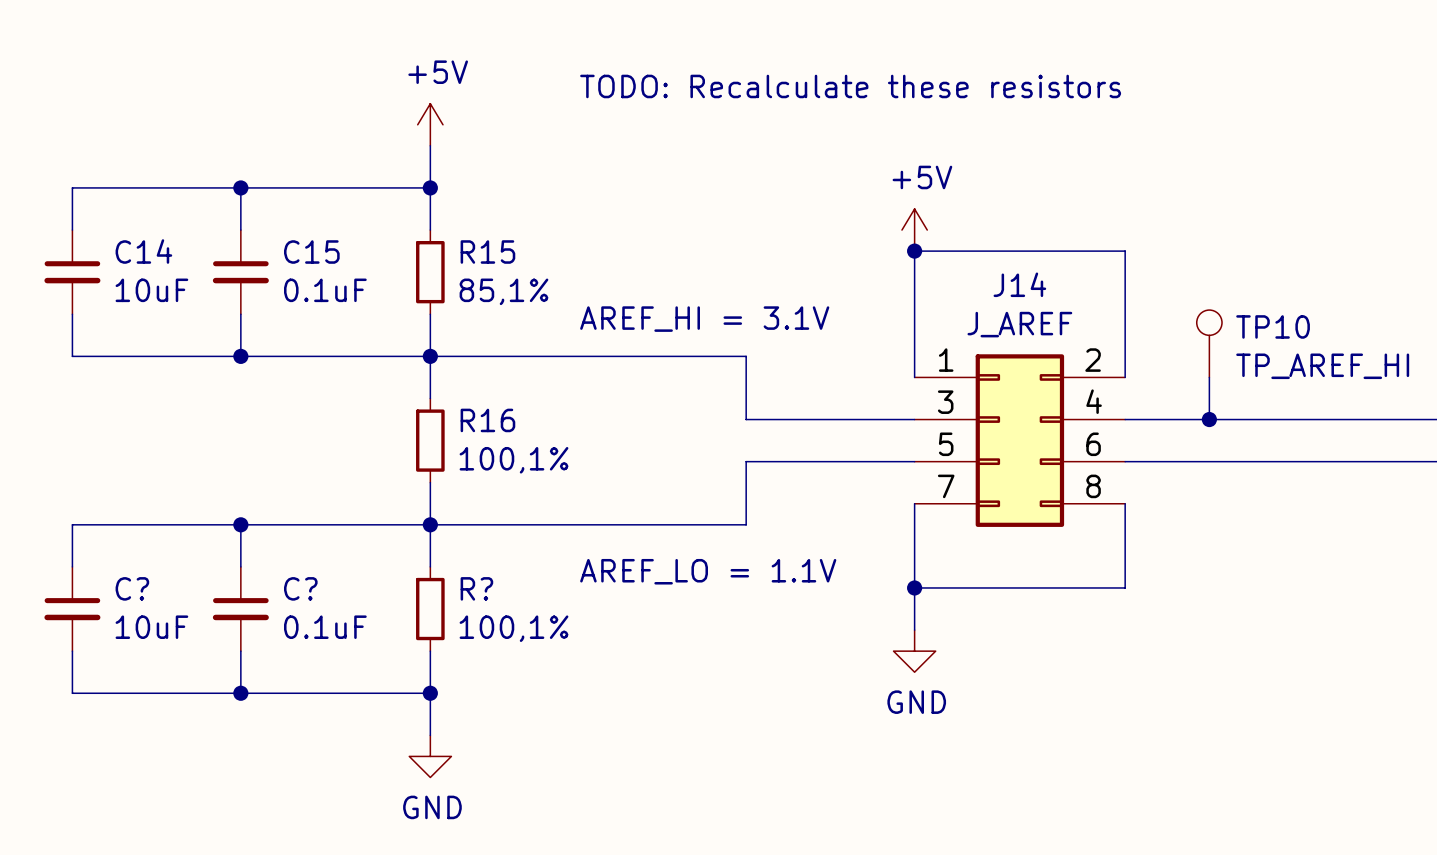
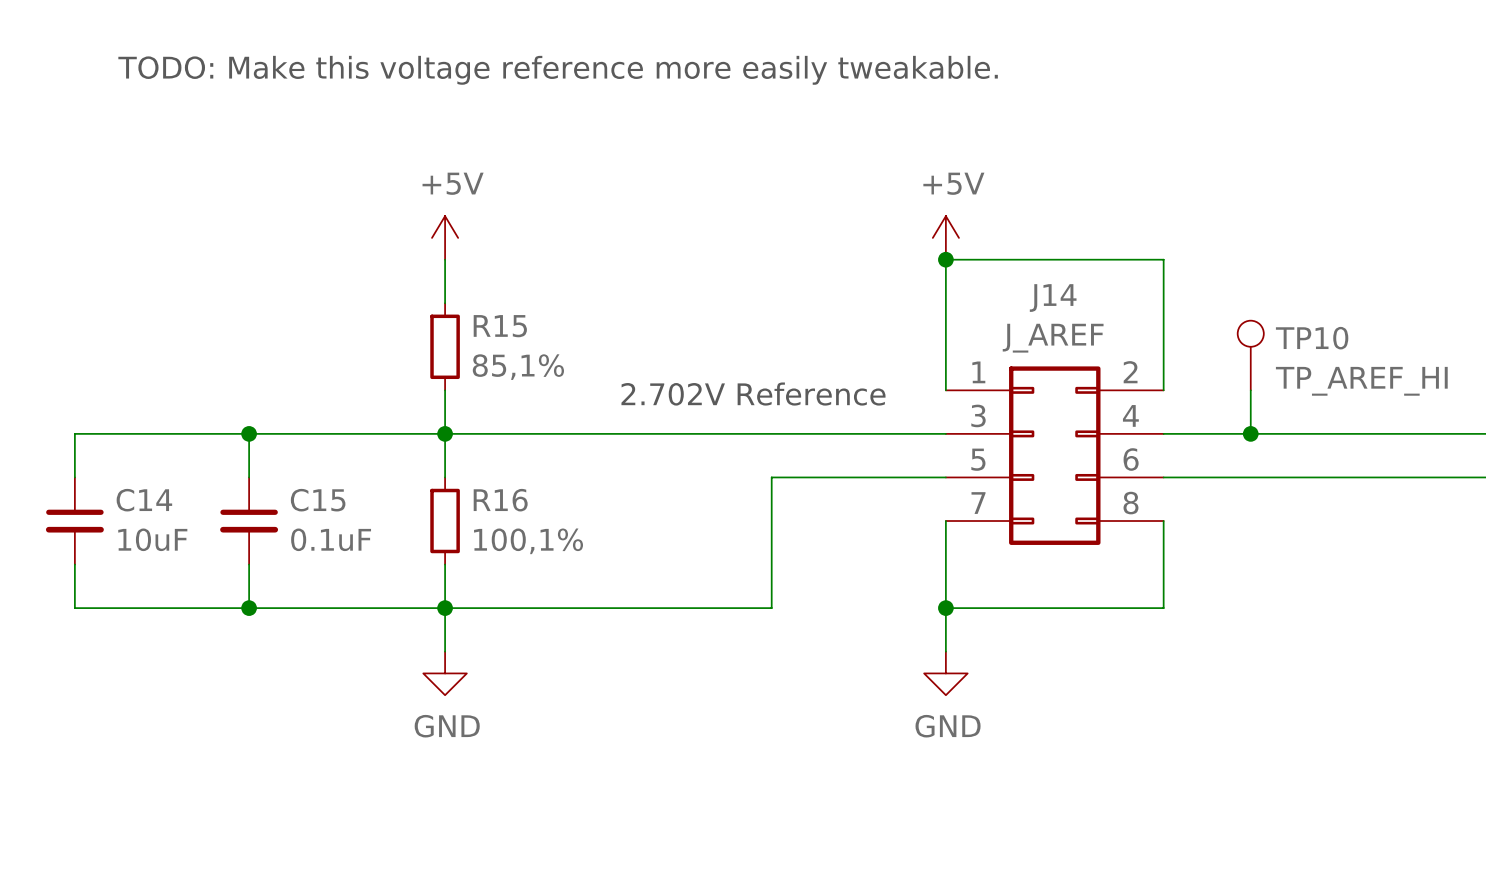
text: none -> TODO: Make this voltage reference more easily tweakable. (558, 70)
text: TODO: Recalculate these resistors (850, 86) -> none
power symbol position: +5V (430, 124) -> +5V (445, 237)
wire: (430, 145) (430, 230) -> none
wire: (240, 187) (240, 230) -> (445, 259) (445, 303)
junction: (240, 187) -> none
wire: (430, 187) (72, 187) (72, 230) -> none
junction: (430, 187) -> none
C14 position: (72, 272) -> (74, 521)
C15 position: (240, 272) -> (249, 521)
R15 position: (430, 272) -> (445, 346)
wire: (72, 314) (72, 356) (746, 356) (746, 419) -> (74, 477) (74, 433) (771, 433)
wire: (240, 314) (240, 356) -> (249, 433) (249, 477)
wire: (430, 314) (430, 377) -> (445, 412) (445, 477)
text: AREF_HI = 3.1V (704, 319) -> none
junction: (240, 356) -> none
junction: (430, 356) -> none
text: none -> 2.702V Reference (753, 394)
junction: none -> (249, 433)
junction: none -> (445, 433)
R16 position: (430, 440) -> (445, 521)
wire: (430, 482) (430, 545) -> (445, 586) (445, 651)
junction: (240, 524) -> none
junction: (430, 524) -> none
wire: (746, 524) (72, 524) (72, 545) -> (771, 542) (771, 608) (74, 608) (74, 586)
text: AREF_LO = 1.1V (708, 571) -> none
junction: none -> (249, 608)
junction: none -> (445, 608)
C?: 10uF (72, 609) -> none
C?: 0.1uF (240, 609) -> none
R?: 100,1% (430, 609) -> none
wire: (72, 651) (72, 693) (430, 693) -> none
wire: (240, 651) (240, 693) -> none
wire: (430, 651) (430, 735) -> none
junction: (240, 693) -> none
junction: (430, 693) -> none
power symbol position: GND (430, 756) -> GND (445, 673)

